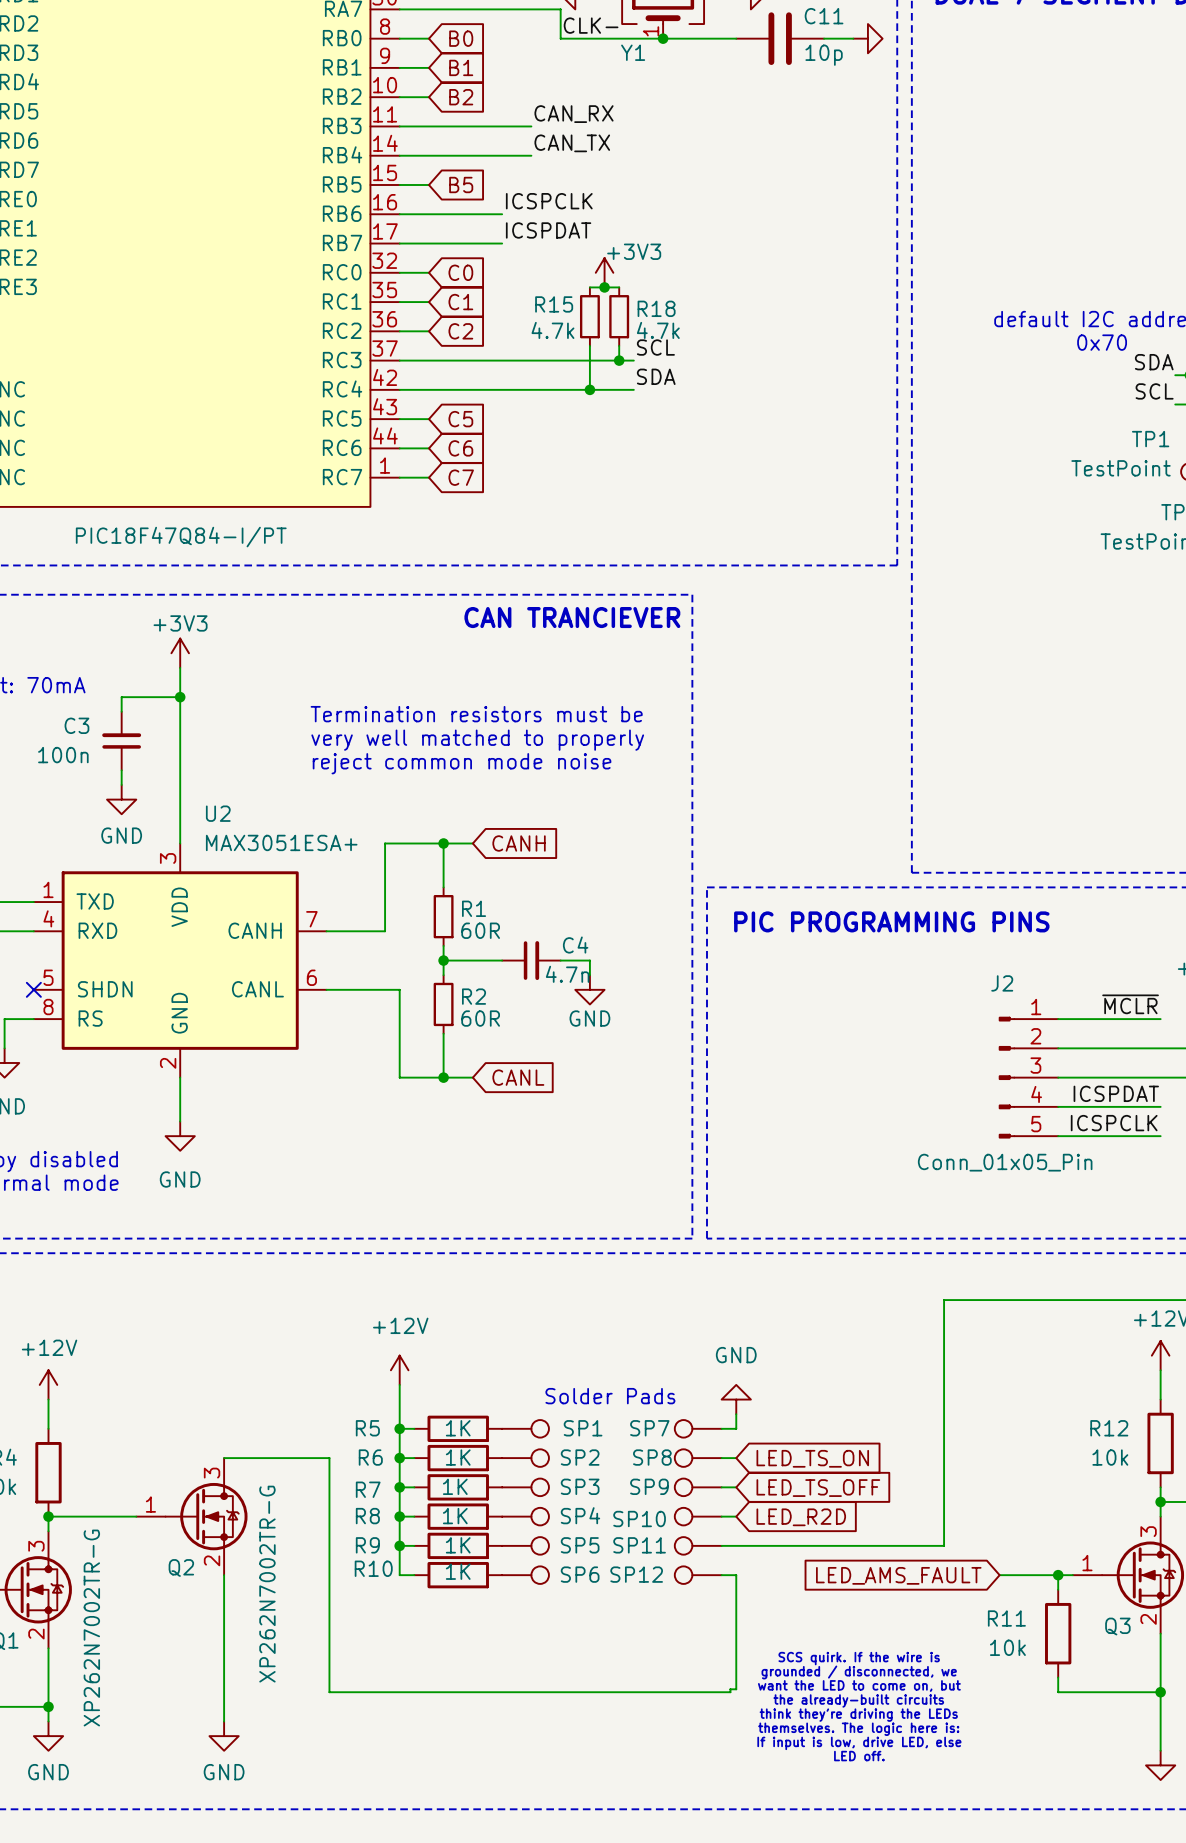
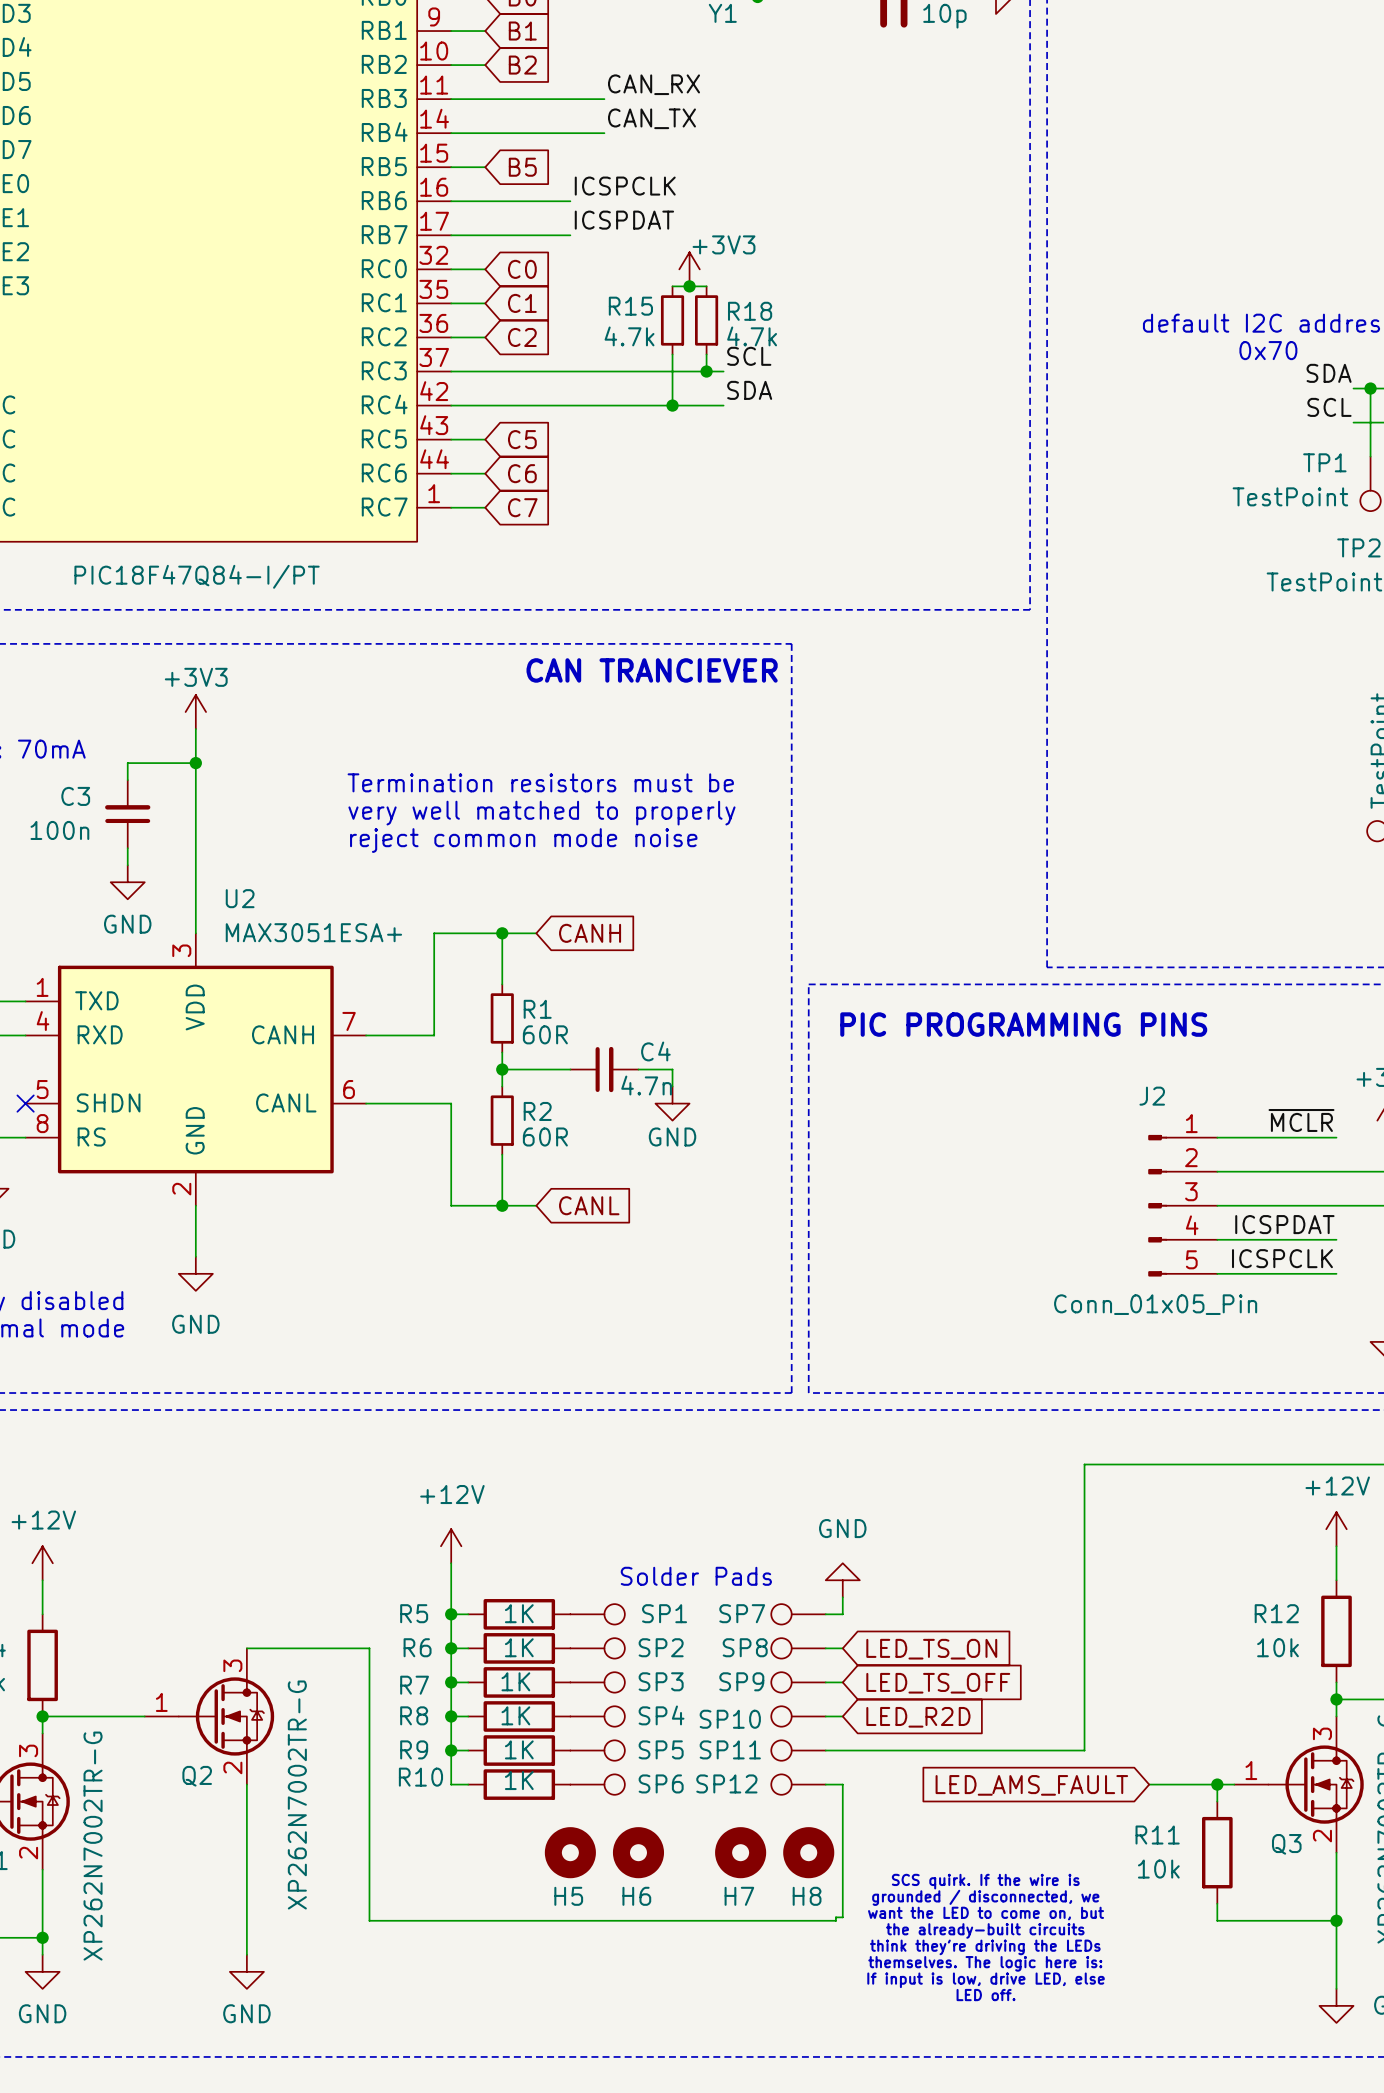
H5: none -> (570, 1852)
H6: none -> (638, 1852)
H7: none -> (740, 1852)
H8: none -> (808, 1852)

